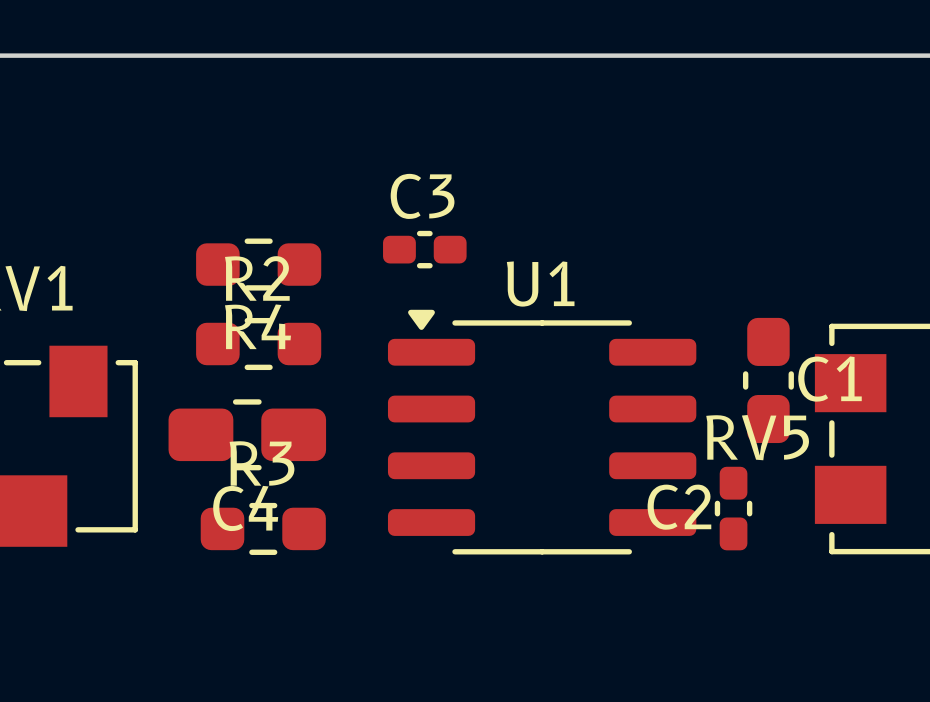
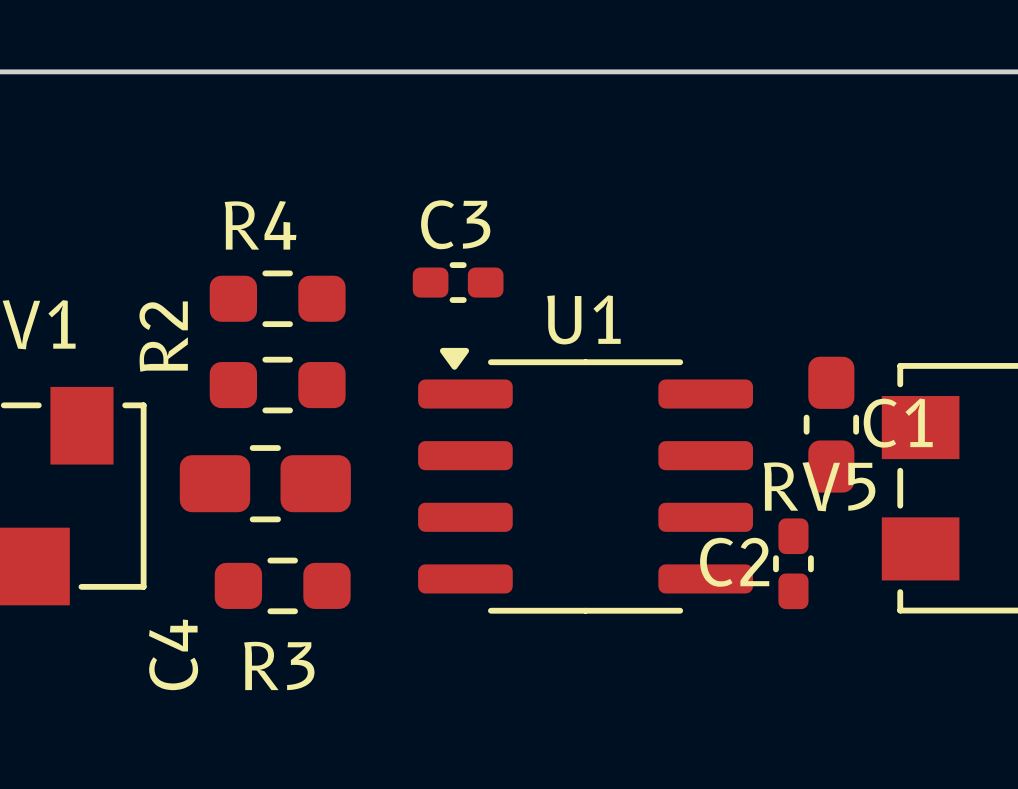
R2 name rotation: 0° (257, 278) -> 90° counterclockwise (163, 336)
R4 name position: R4 (258, 326) -> R4 (260, 225)
R3 name position: R3 (262, 463) -> R3 (279, 665)
C4 name rotation: 0° (245, 508) -> 90° counterclockwise (173, 654)
C4 name position: C4 (245, 508) -> C4 (173, 654)

